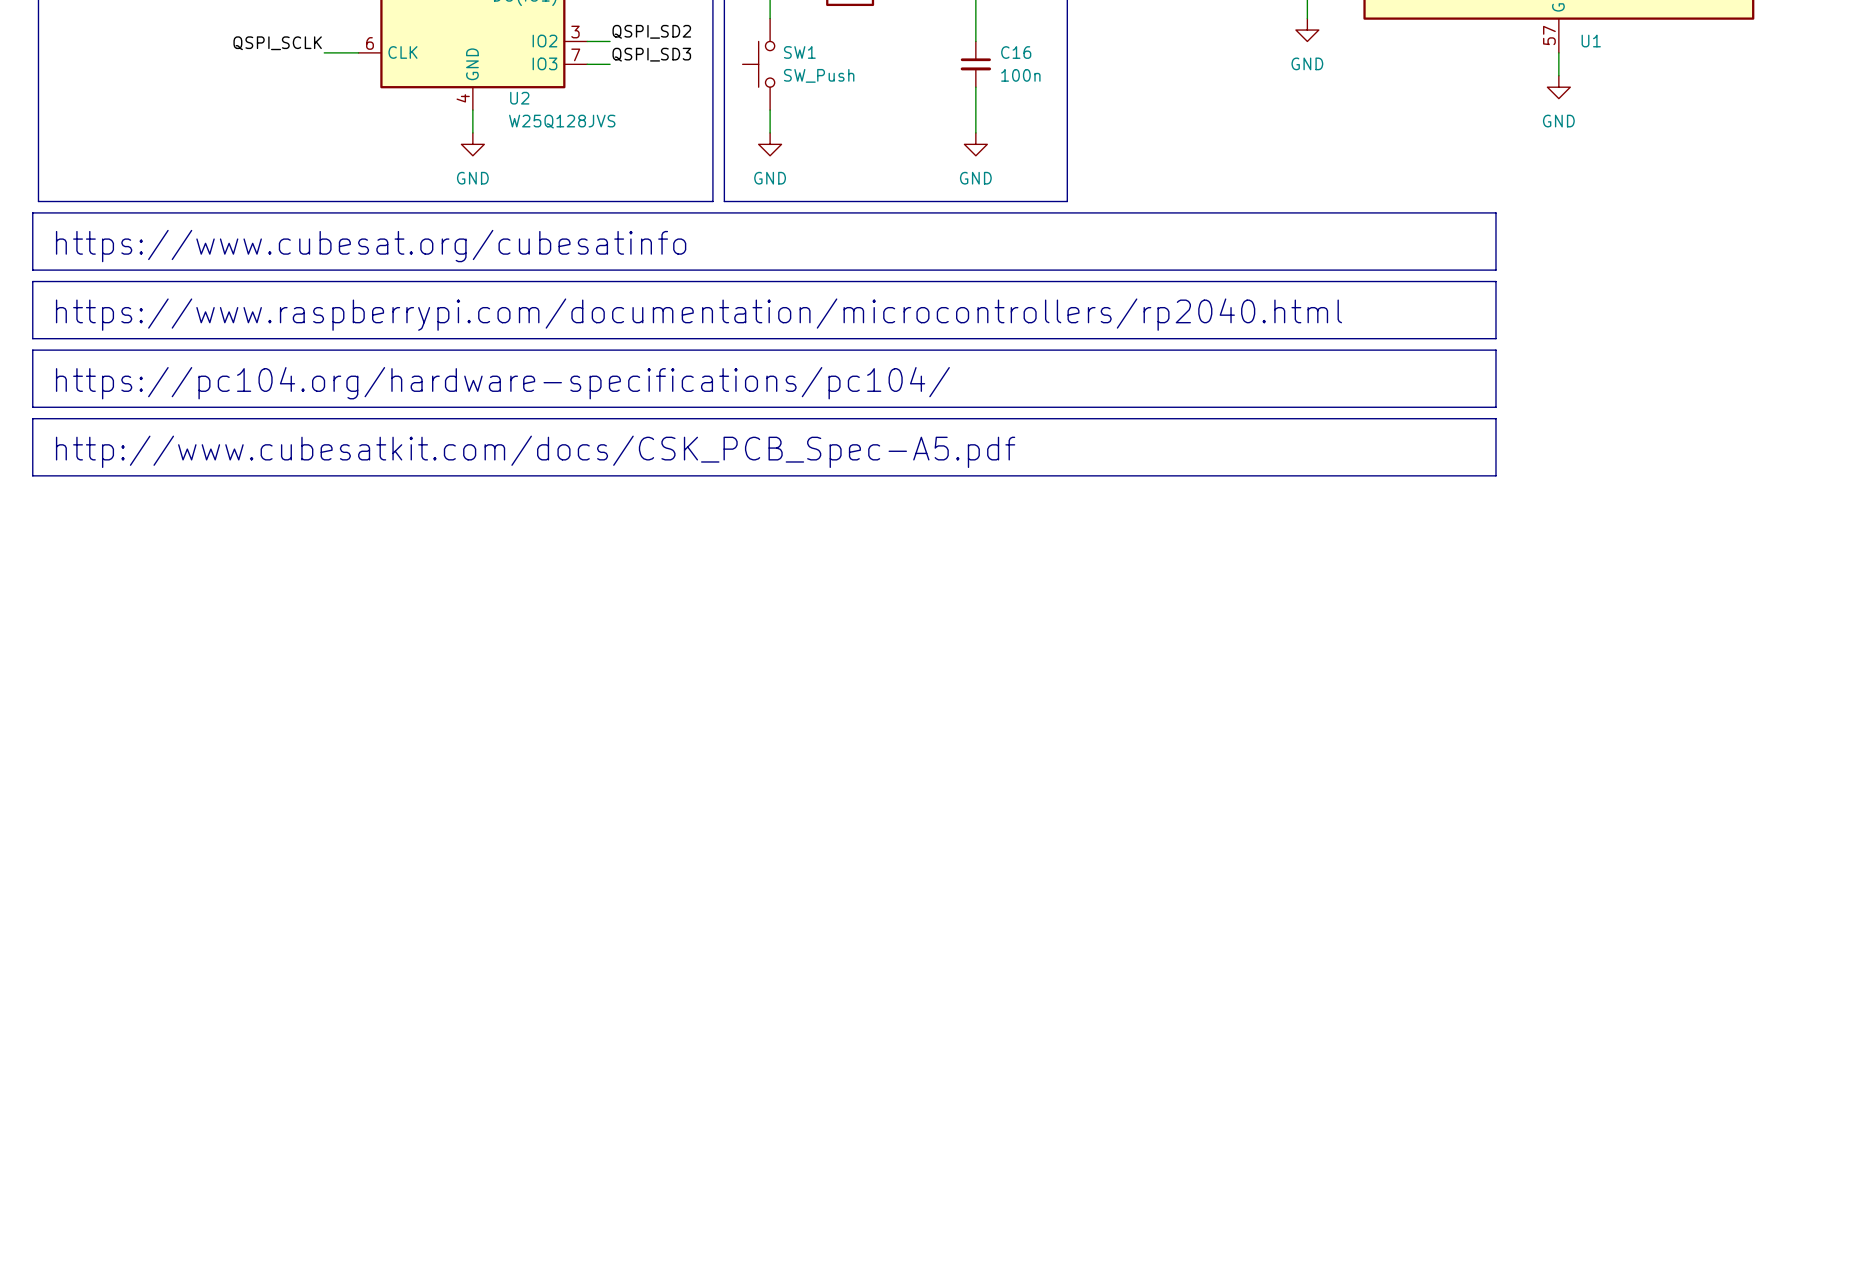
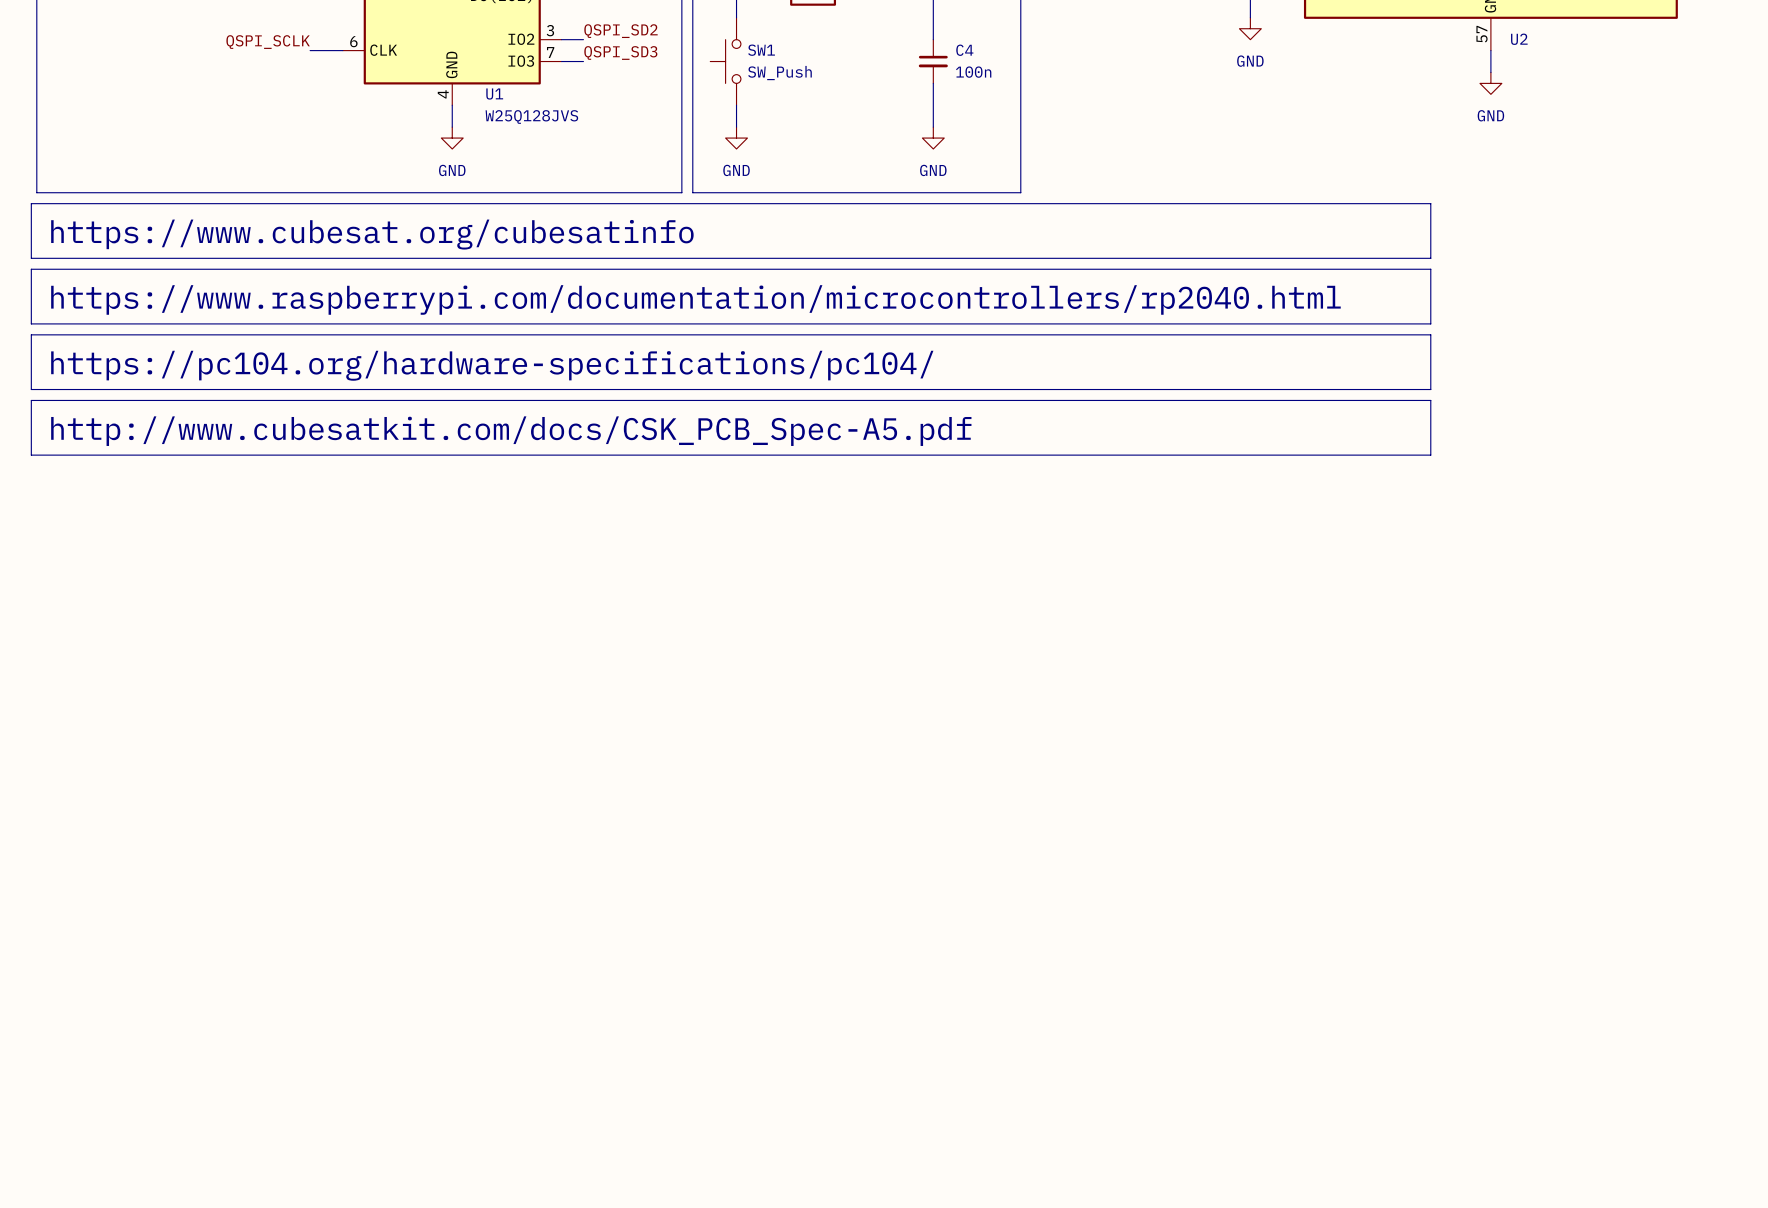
U1 name: U1 (1591, 41) -> U2 (1519, 39)
C16 name: C16 (1016, 52) -> C4 (964, 50)
U2 name: U2 (519, 98) -> U1 (494, 94)

